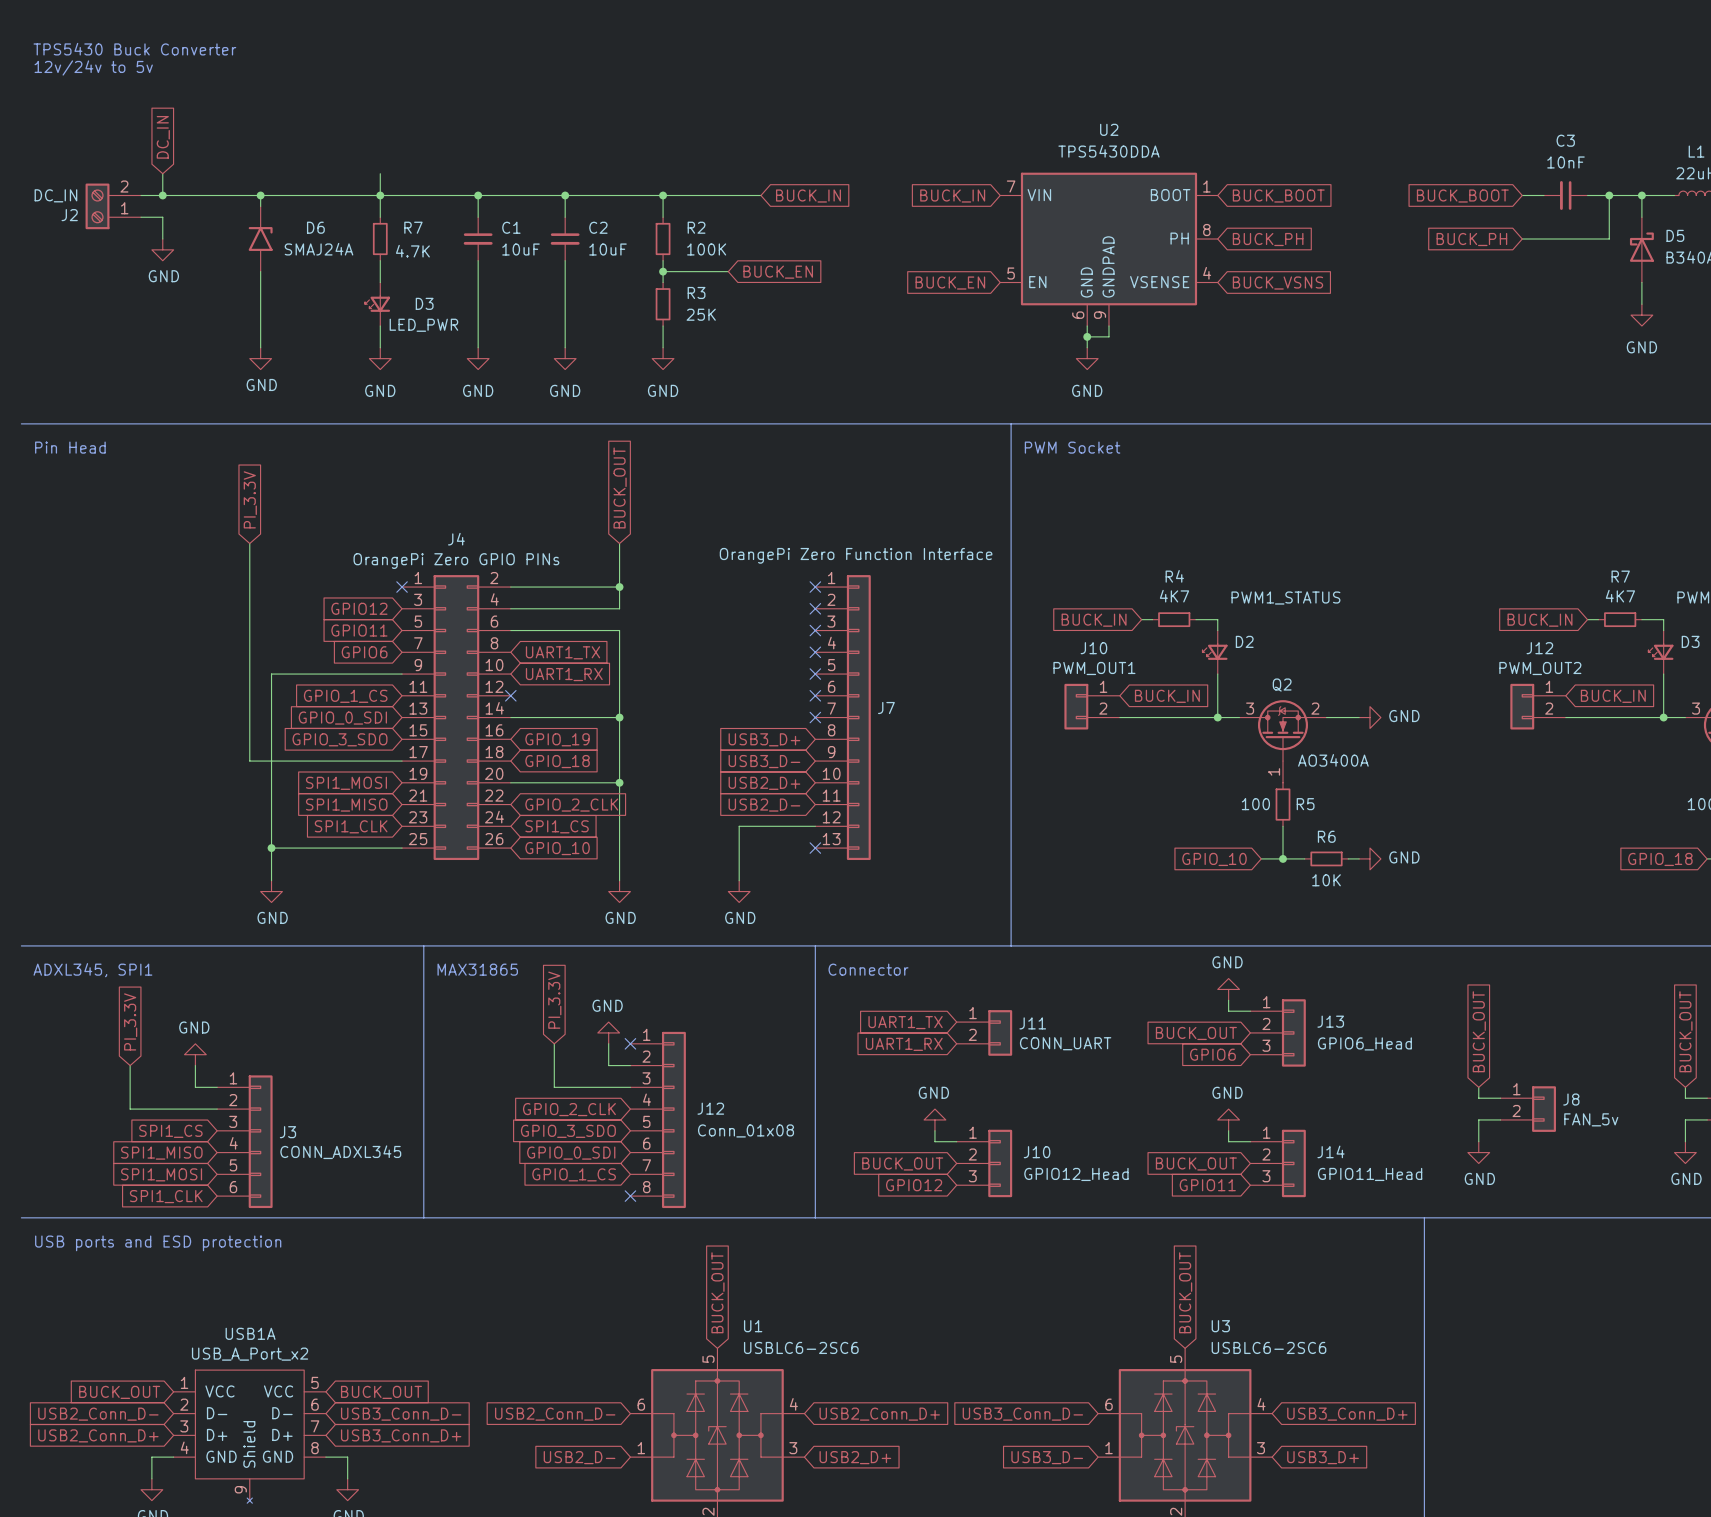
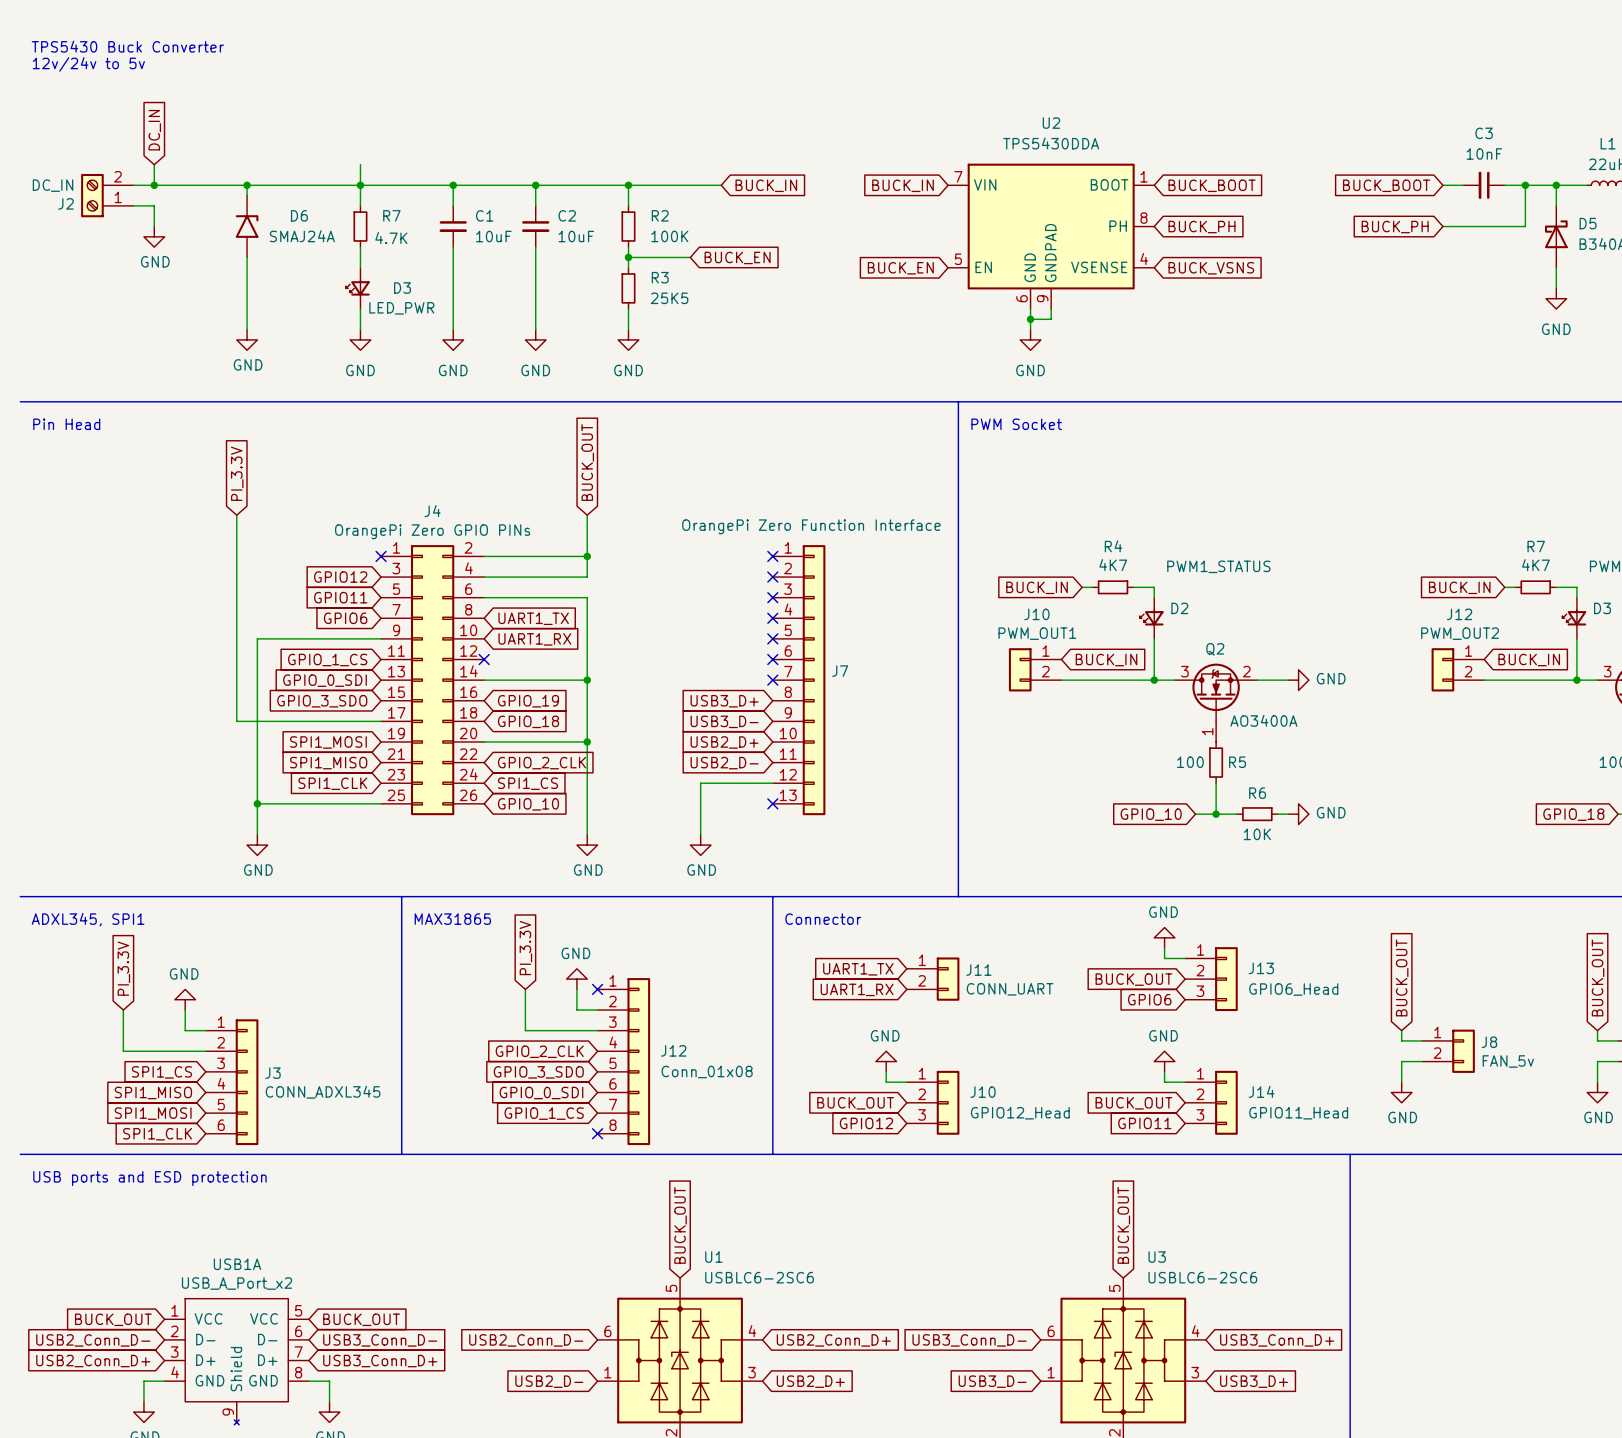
R3 value: 25K (701, 314) -> 25K5 (669, 298)

